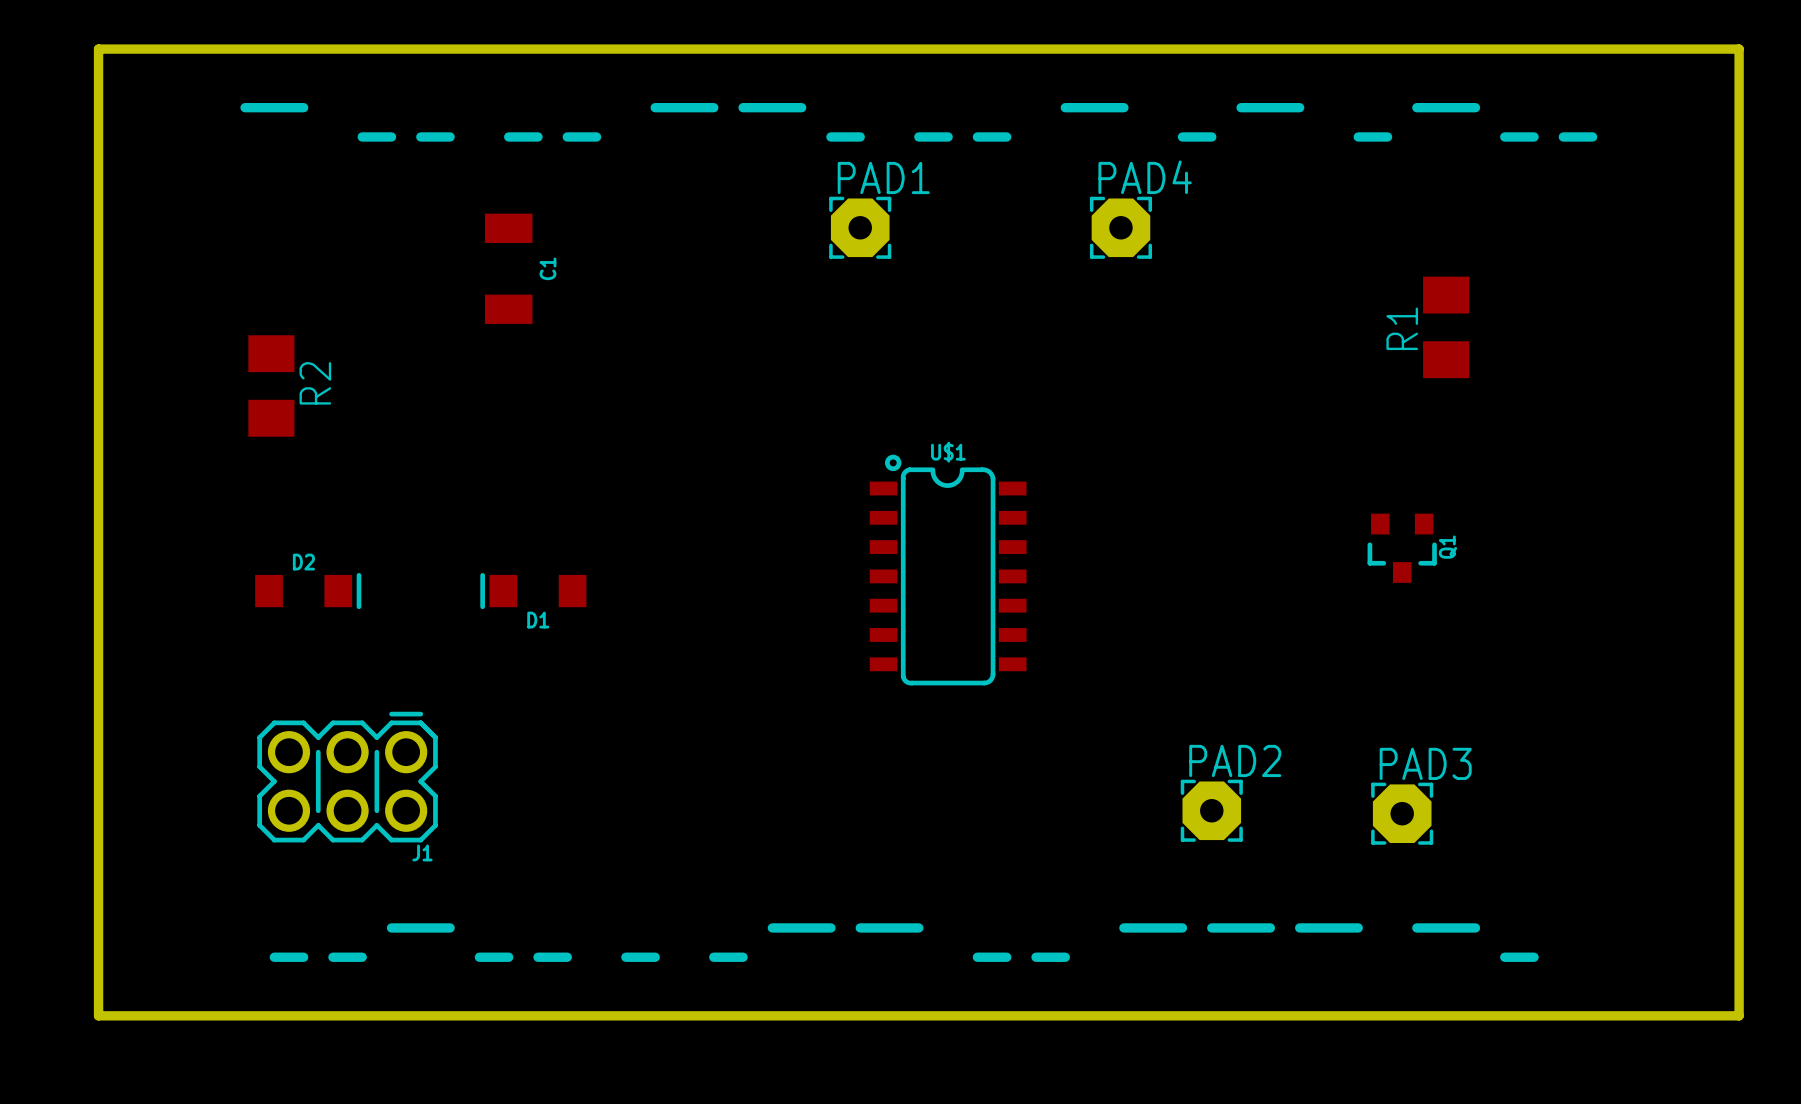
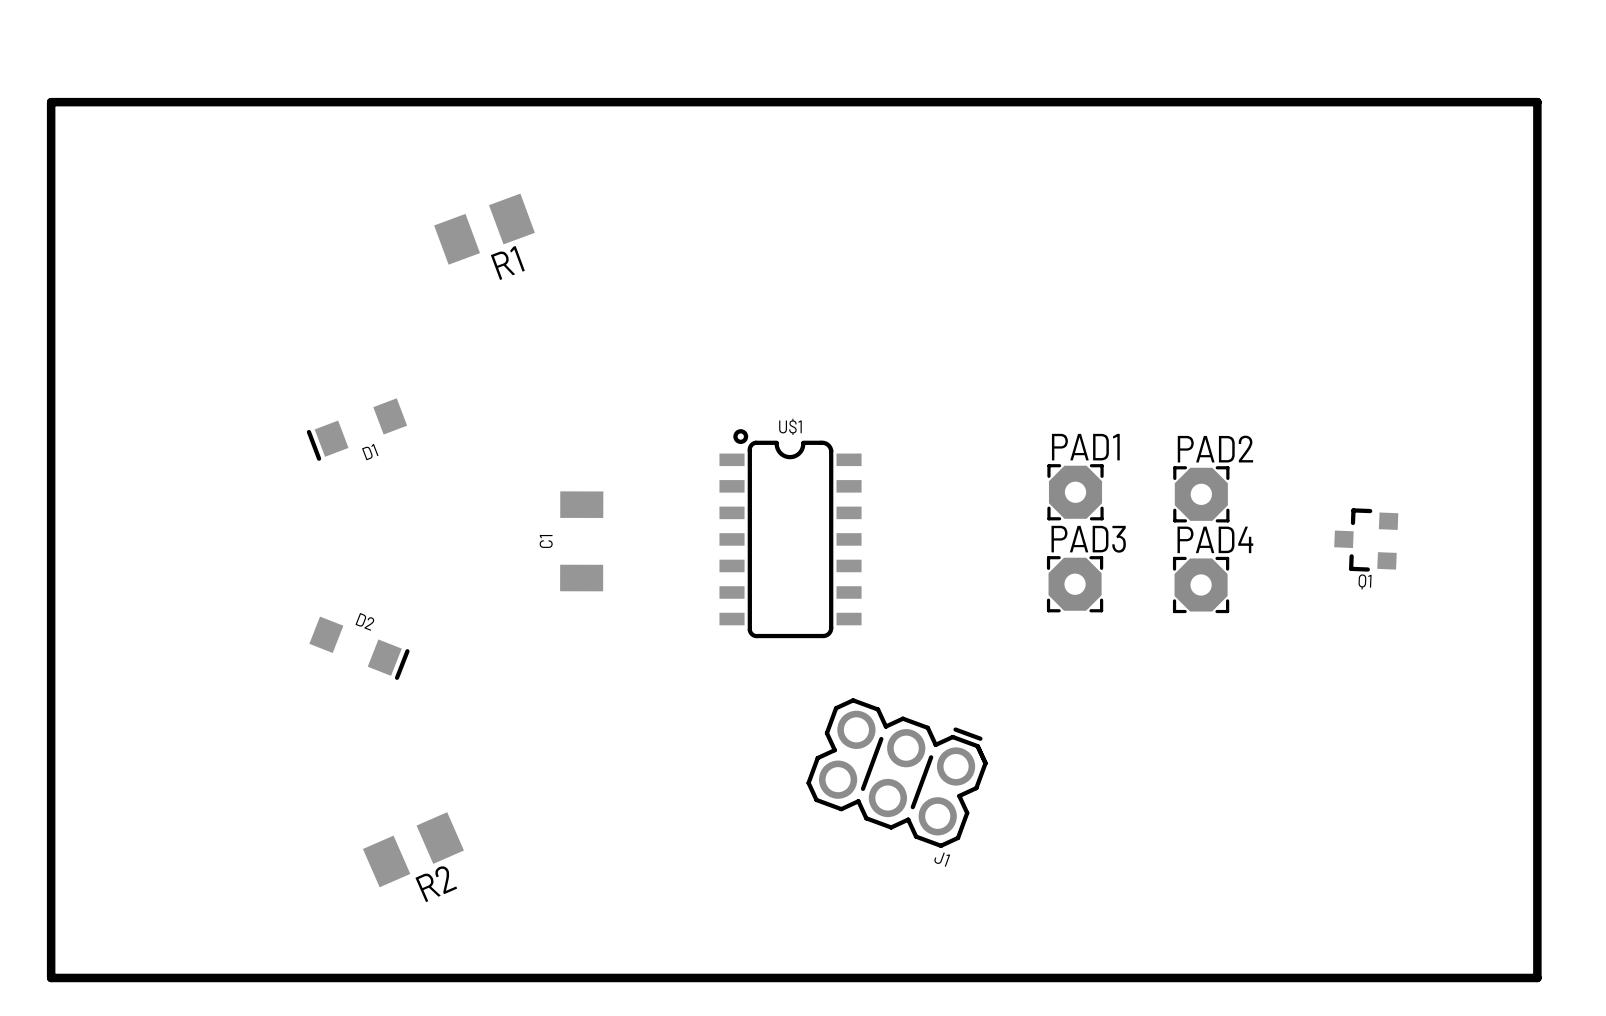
line: (245, 107) (303, 107) -> none
line: (655, 107) (713, 107) -> none
line: (743, 107) (801, 107) -> none
line: (1065, 107) (1123, 107) -> none
line: (1241, 107) (1299, 107) -> none
line: (1416, 107) (1475, 107) -> none
line: (362, 136) (391, 136) -> none
line: (420, 136) (450, 136) -> none
line: (508, 136) (537, 136) -> none
line: (567, 136) (596, 136) -> none
line: (830, 136) (860, 136) -> none
line: (918, 136) (948, 136) -> none
line: (977, 136) (1006, 136) -> none
line: (1182, 136) (1211, 136) -> none
line: (1358, 136) (1387, 136) -> none
line: (1504, 136) (1534, 136) -> none
line: (1563, 136) (1592, 136) -> none
PAD1 position: (860, 227) -> (1075, 492)
PAD4 position: (1120, 227) -> (1201, 584)
C1 position: (508, 268) -> (581, 541)
C1 name rotation: 0° (547, 268) -> 0.1° clockwise (546, 541)
C1 name position: C1 (547, 268) -> C1 (546, 541)
R1 rotation: 0° (1446, 327) -> 69.7° clockwise (484, 229)
R1 position: (1446, 327) -> (484, 229)
R1 name position: R1 (1402, 328) -> R1 (507, 262)
R2 rotation: 0° (271, 385) -> 66.4° clockwise (413, 849)
R2 position: (271, 385) -> (413, 849)
Q1 rotation: 0° (1402, 548) -> 92.3° clockwise (1366, 539)
Q1 position: (1402, 548) -> (1366, 539)
U$1 position: (948, 570) -> (790, 533)
D2 rotation: 0° (308, 591) -> 21.4° clockwise (359, 648)
D2 position: (308, 591) -> (359, 648)
D1 rotation: 0° (533, 591) -> 20.8° counterclockwise (356, 429)
D1 position: (533, 591) -> (356, 429)
J1 rotation: 0° (347, 777) -> 20.2° clockwise (897, 773)
J1 position: (347, 777) -> (897, 773)
PAD2 position: (1211, 810) -> (1201, 494)
PAD3 position: (1402, 813) -> (1075, 584)
line: (391, 927) (450, 927) -> none
line: (772, 927) (830, 927) -> none
line: (860, 927) (918, 927) -> none
line: (1123, 927) (1182, 927) -> none
line: (1211, 927) (1270, 927) -> none
line: (1299, 927) (1358, 927) -> none
line: (1416, 927) (1475, 927) -> none
line: (274, 957) (303, 957) -> none
line: (332, 957) (362, 957) -> none
line: (479, 957) (508, 957) -> none
line: (537, 957) (567, 957) -> none
line: (625, 957) (655, 957) -> none
line: (713, 957) (743, 957) -> none
line: (977, 957) (1006, 957) -> none
line: (1036, 957) (1065, 957) -> none
line: (1504, 957) (1534, 957) -> none

